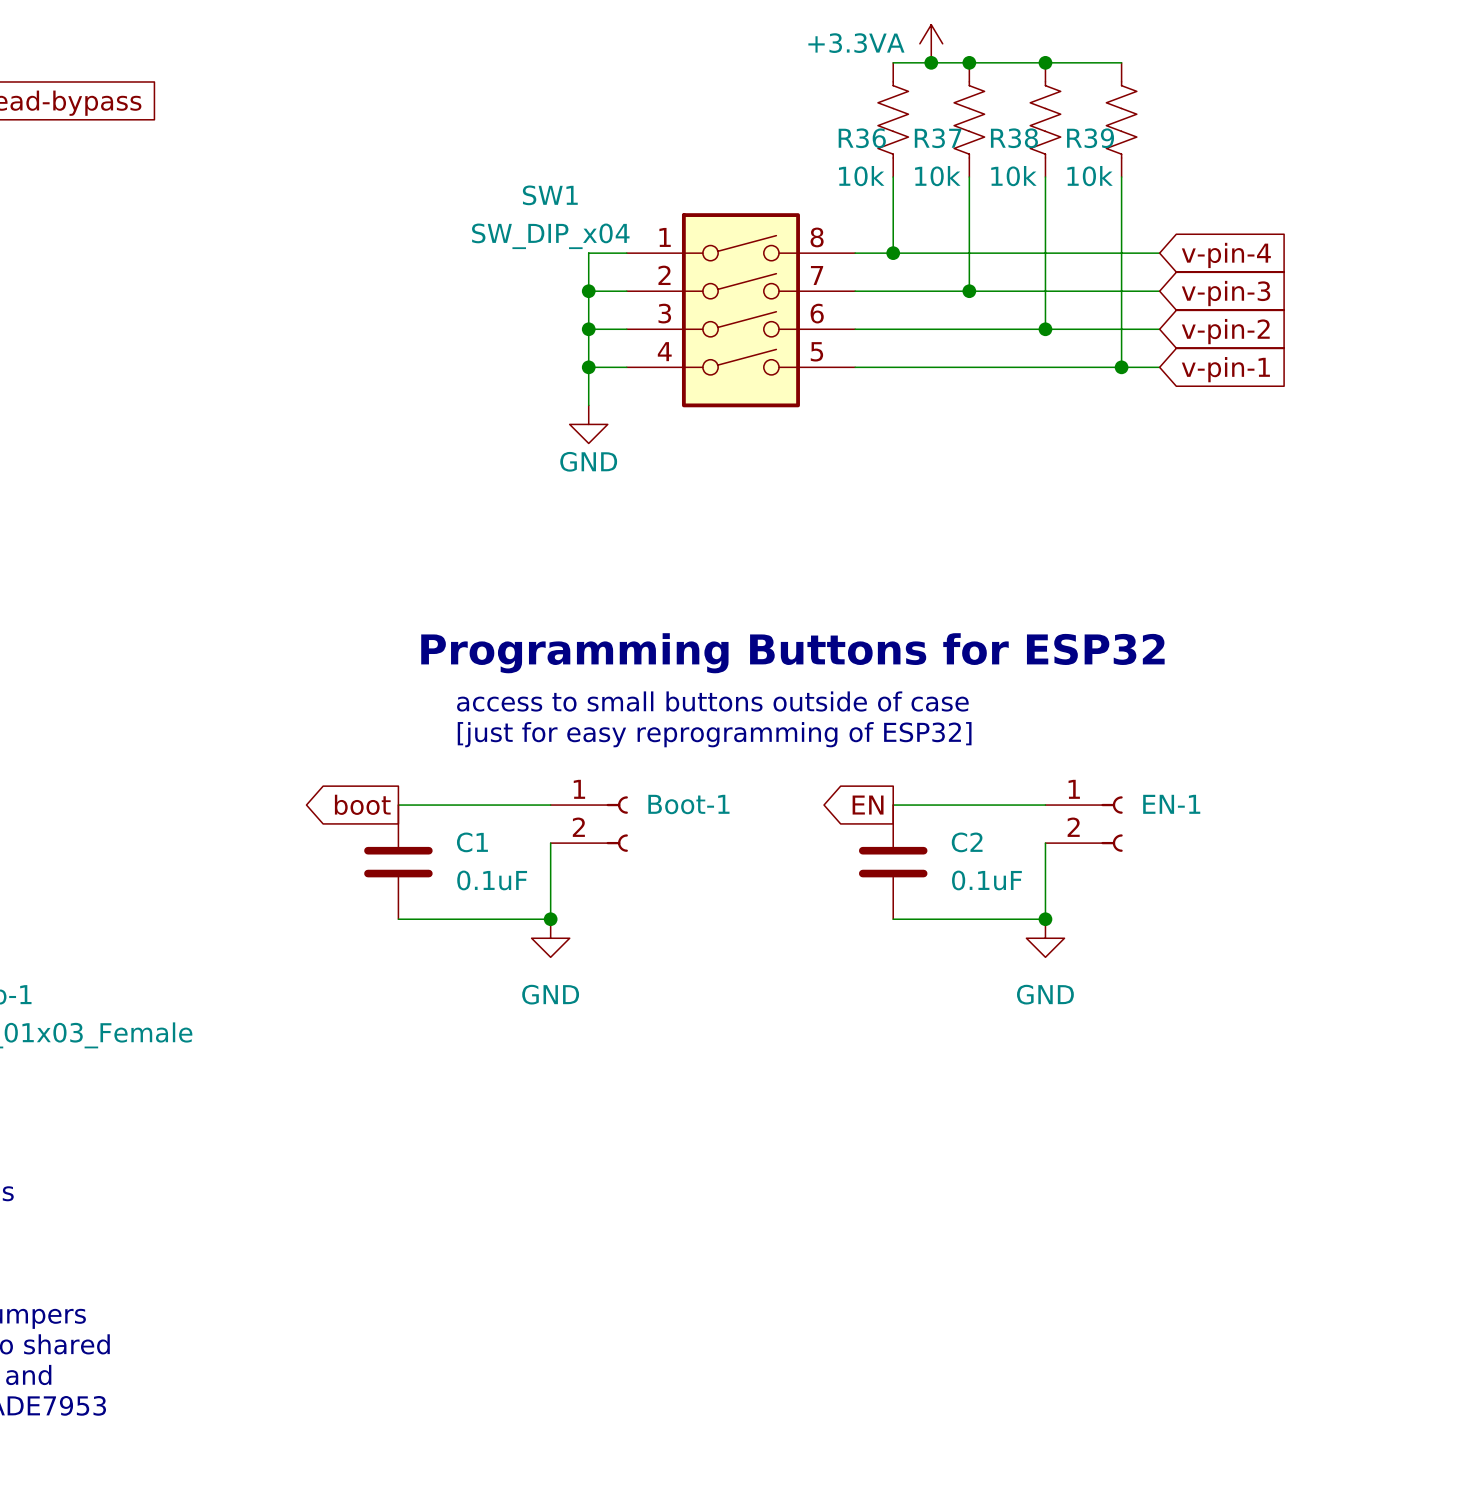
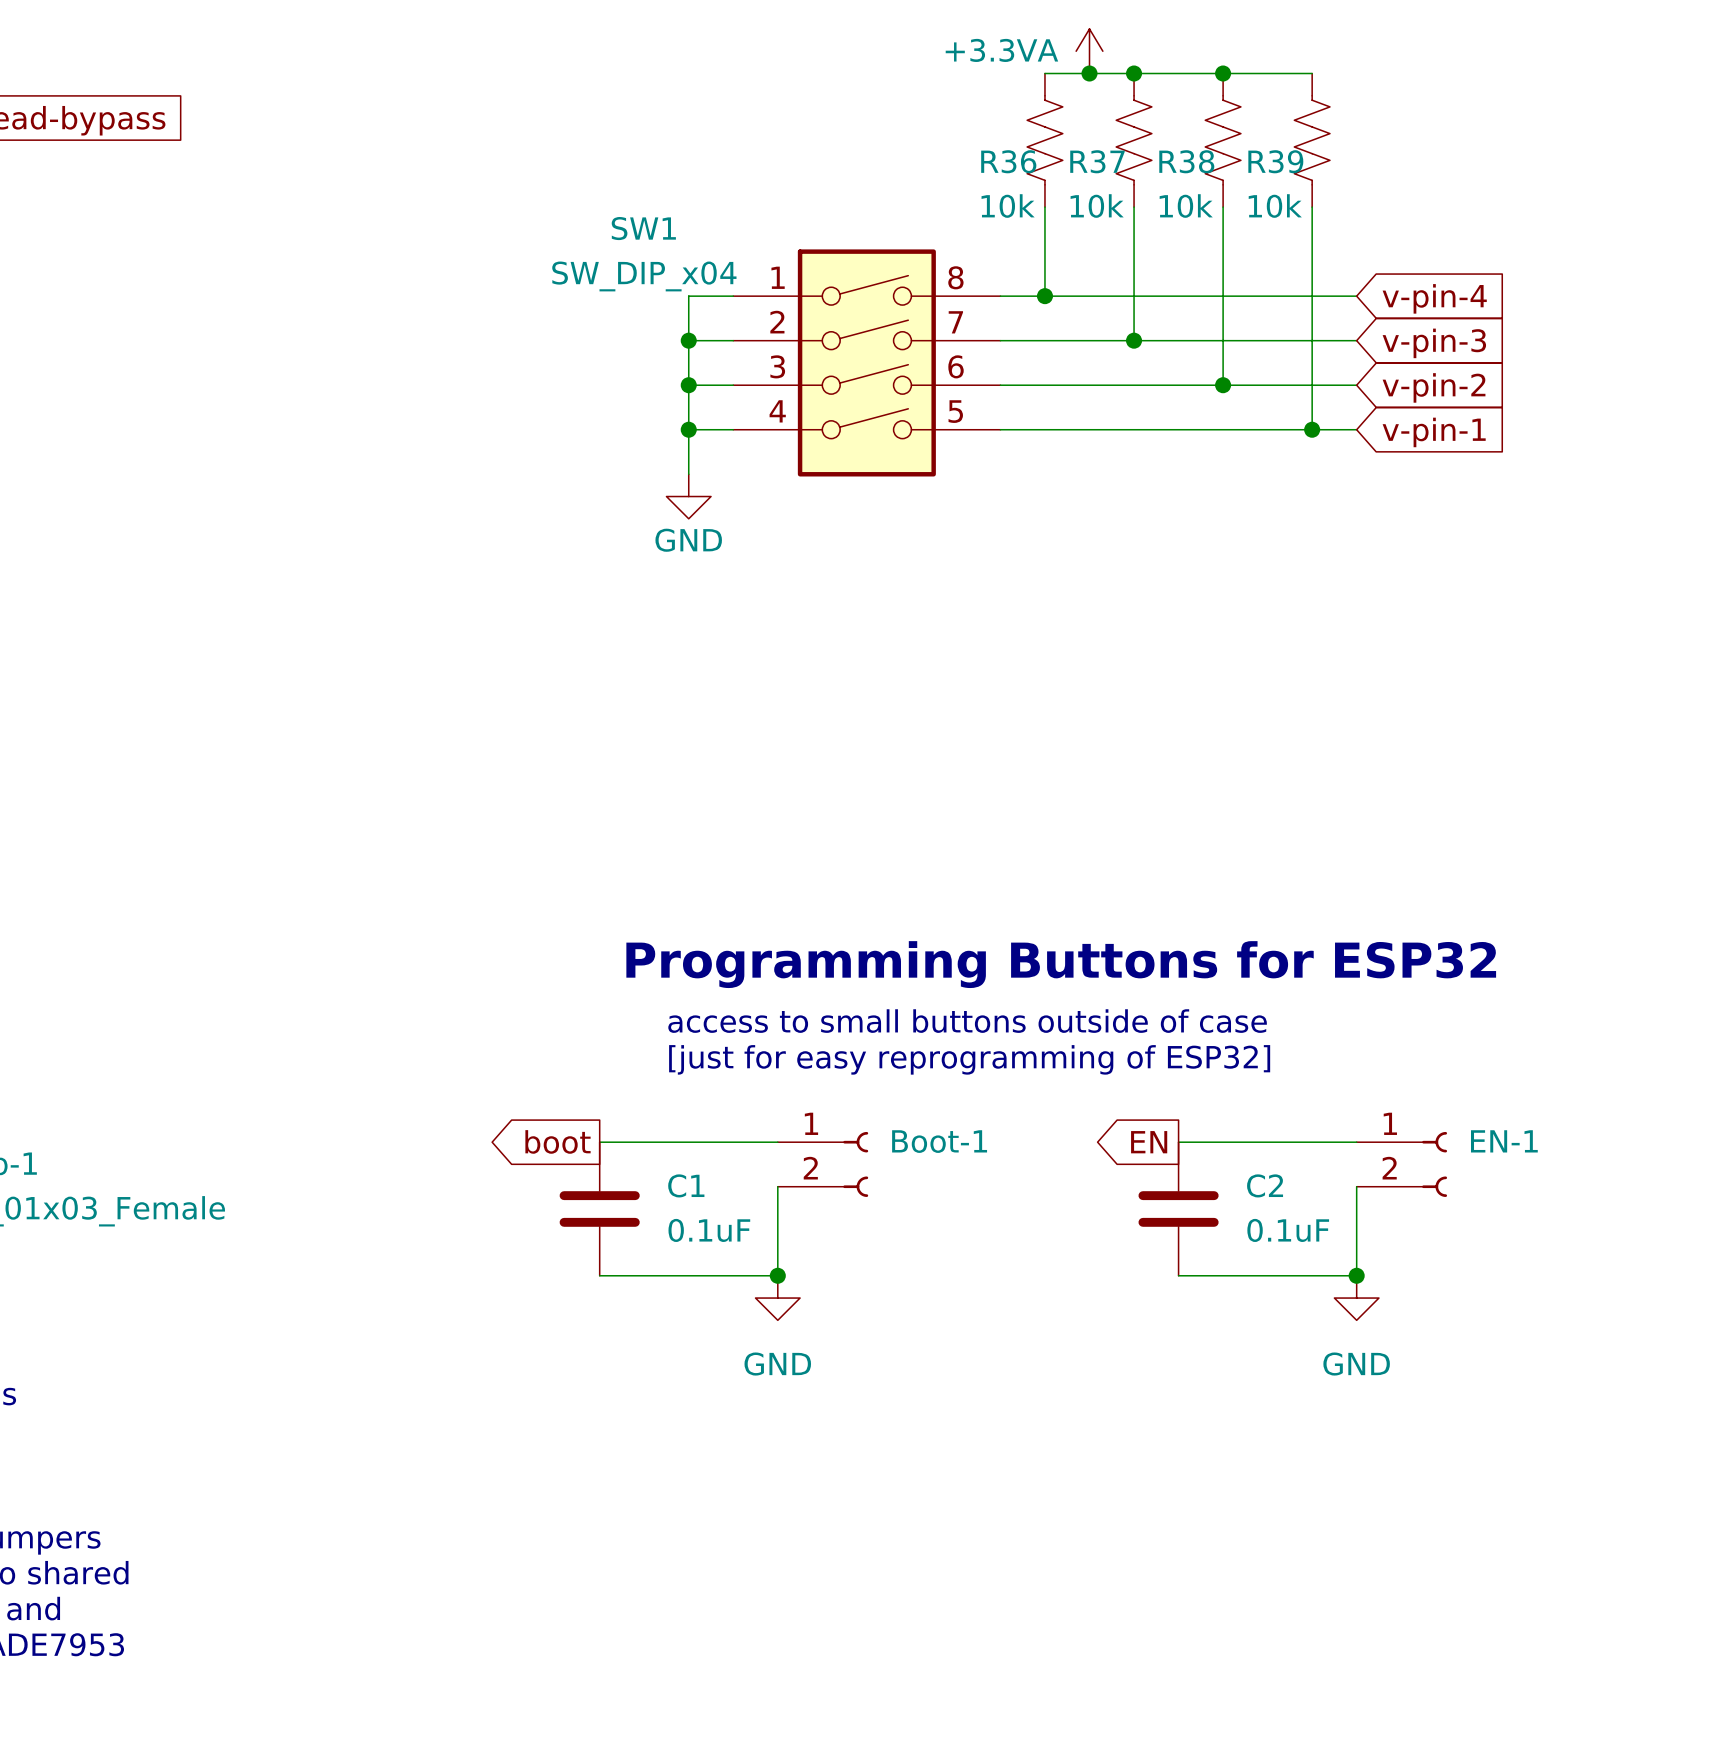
text position: Programming Buttons for ESP32 (792, 653) -> Programming Buttons for ESP32 (1061, 964)
text position: access to small buttons outside of case (712, 701) -> access to small buttons outside of case (967, 1021)
text position: [just for easy reprogramming of ESP32] (714, 734) -> [just for easy reprogramming of ESP32] (969, 1059)
global label position: boot (362, 804) -> boot (558, 1141)
wire: (398, 805) (550, 805) -> (599, 1142) (777, 1142)
global label position: EN (868, 805) -> EN (1149, 1142)
wire: (893, 805) (1045, 805) -> (1178, 1142) (1356, 1142)
Boot-1 position: (589, 824) -> (823, 1164)
EN-1 position: (1084, 824) -> (1401, 1164)
wire: (550, 843) (550, 919) (398, 919) -> (777, 1186) (777, 1275) (599, 1275)
wire: (1045, 843) (1045, 919) (893, 919) -> (1356, 1186) (1356, 1275) (1178, 1275)
C1 position: (398, 862) -> (599, 1208)
C2 position: (893, 862) -> (1178, 1208)
junction: (550, 919) -> none
junction: (1045, 919) -> none
power symbol position: GND (550, 938) -> GND (777, 1298)
power symbol position: GND (1045, 938) -> GND (1356, 1298)
junction: none -> (777, 1275)
junction: none -> (1356, 1275)

